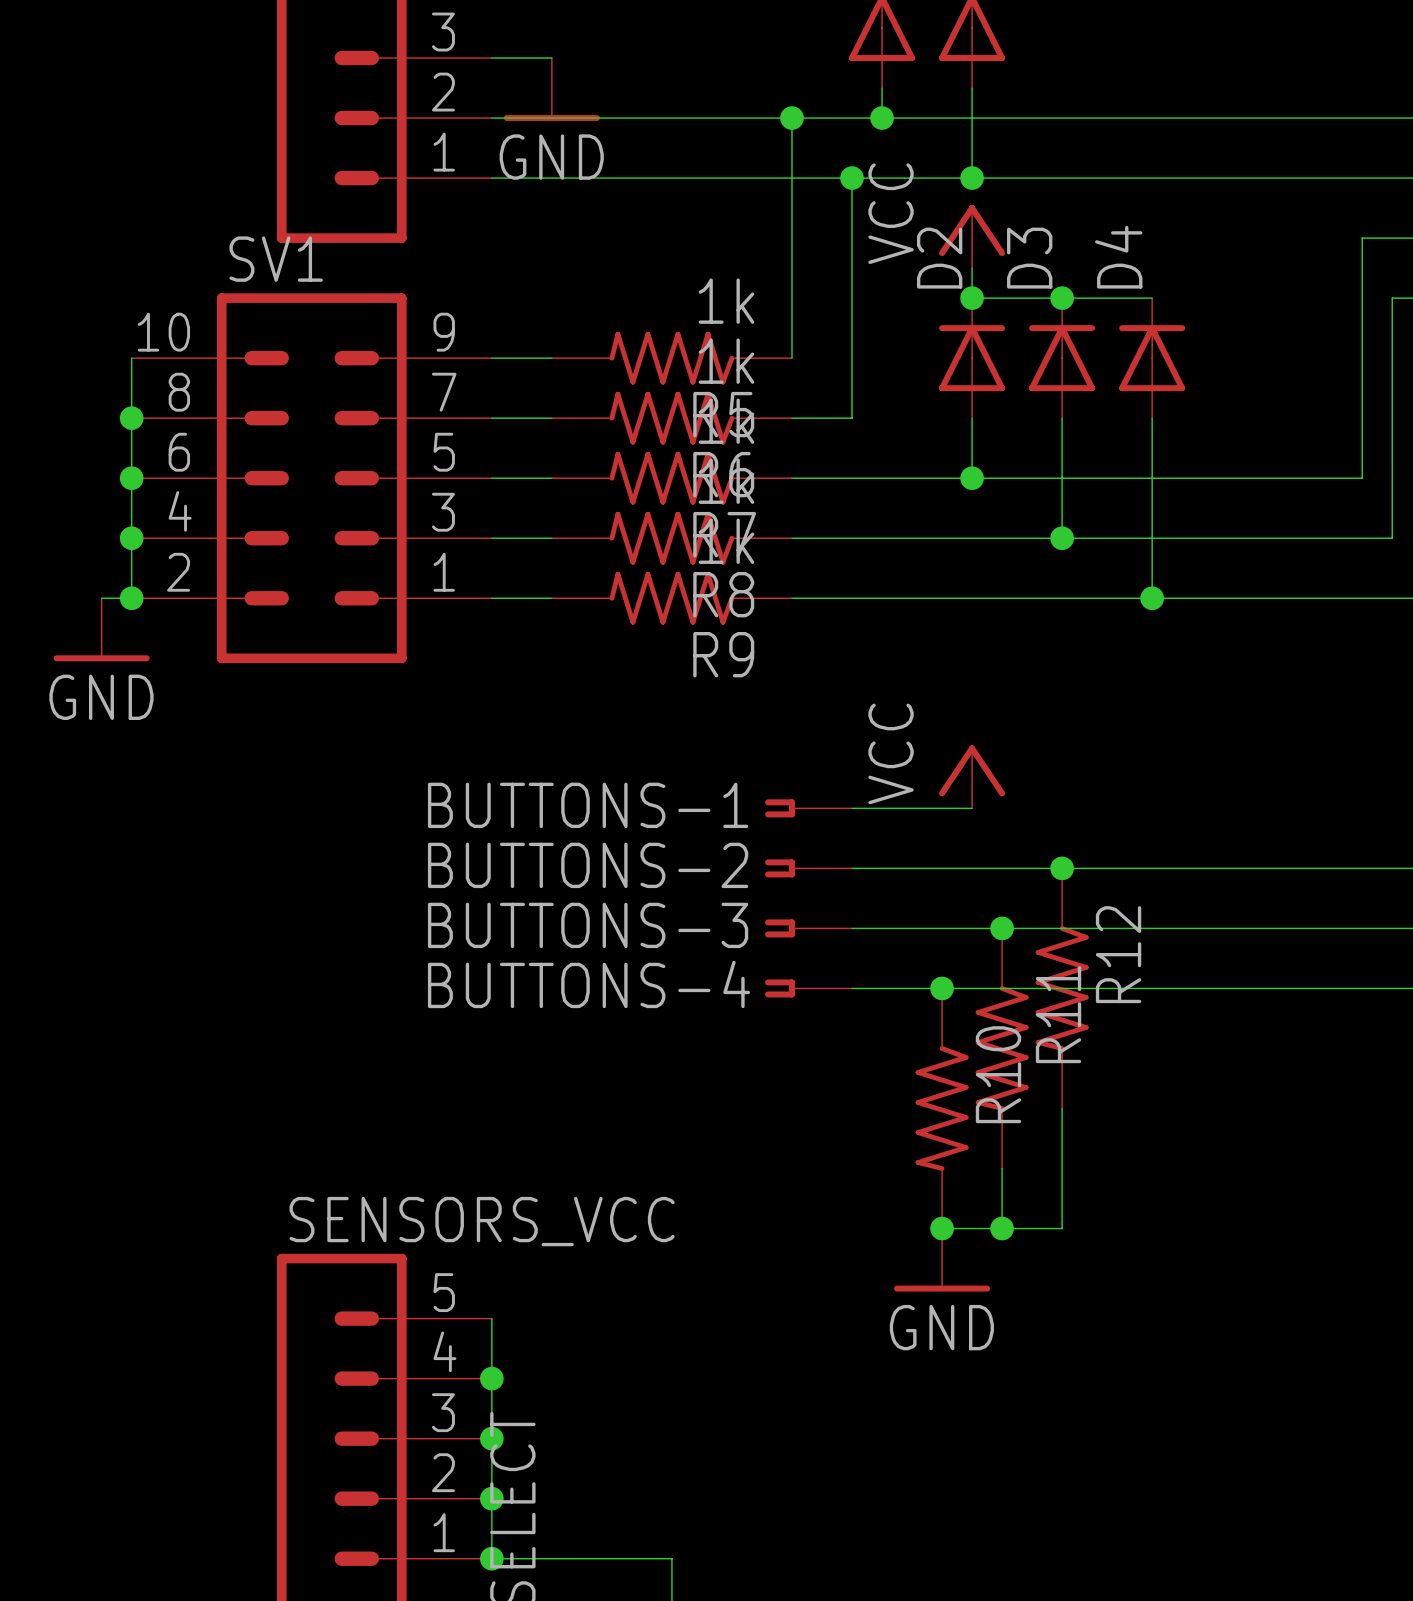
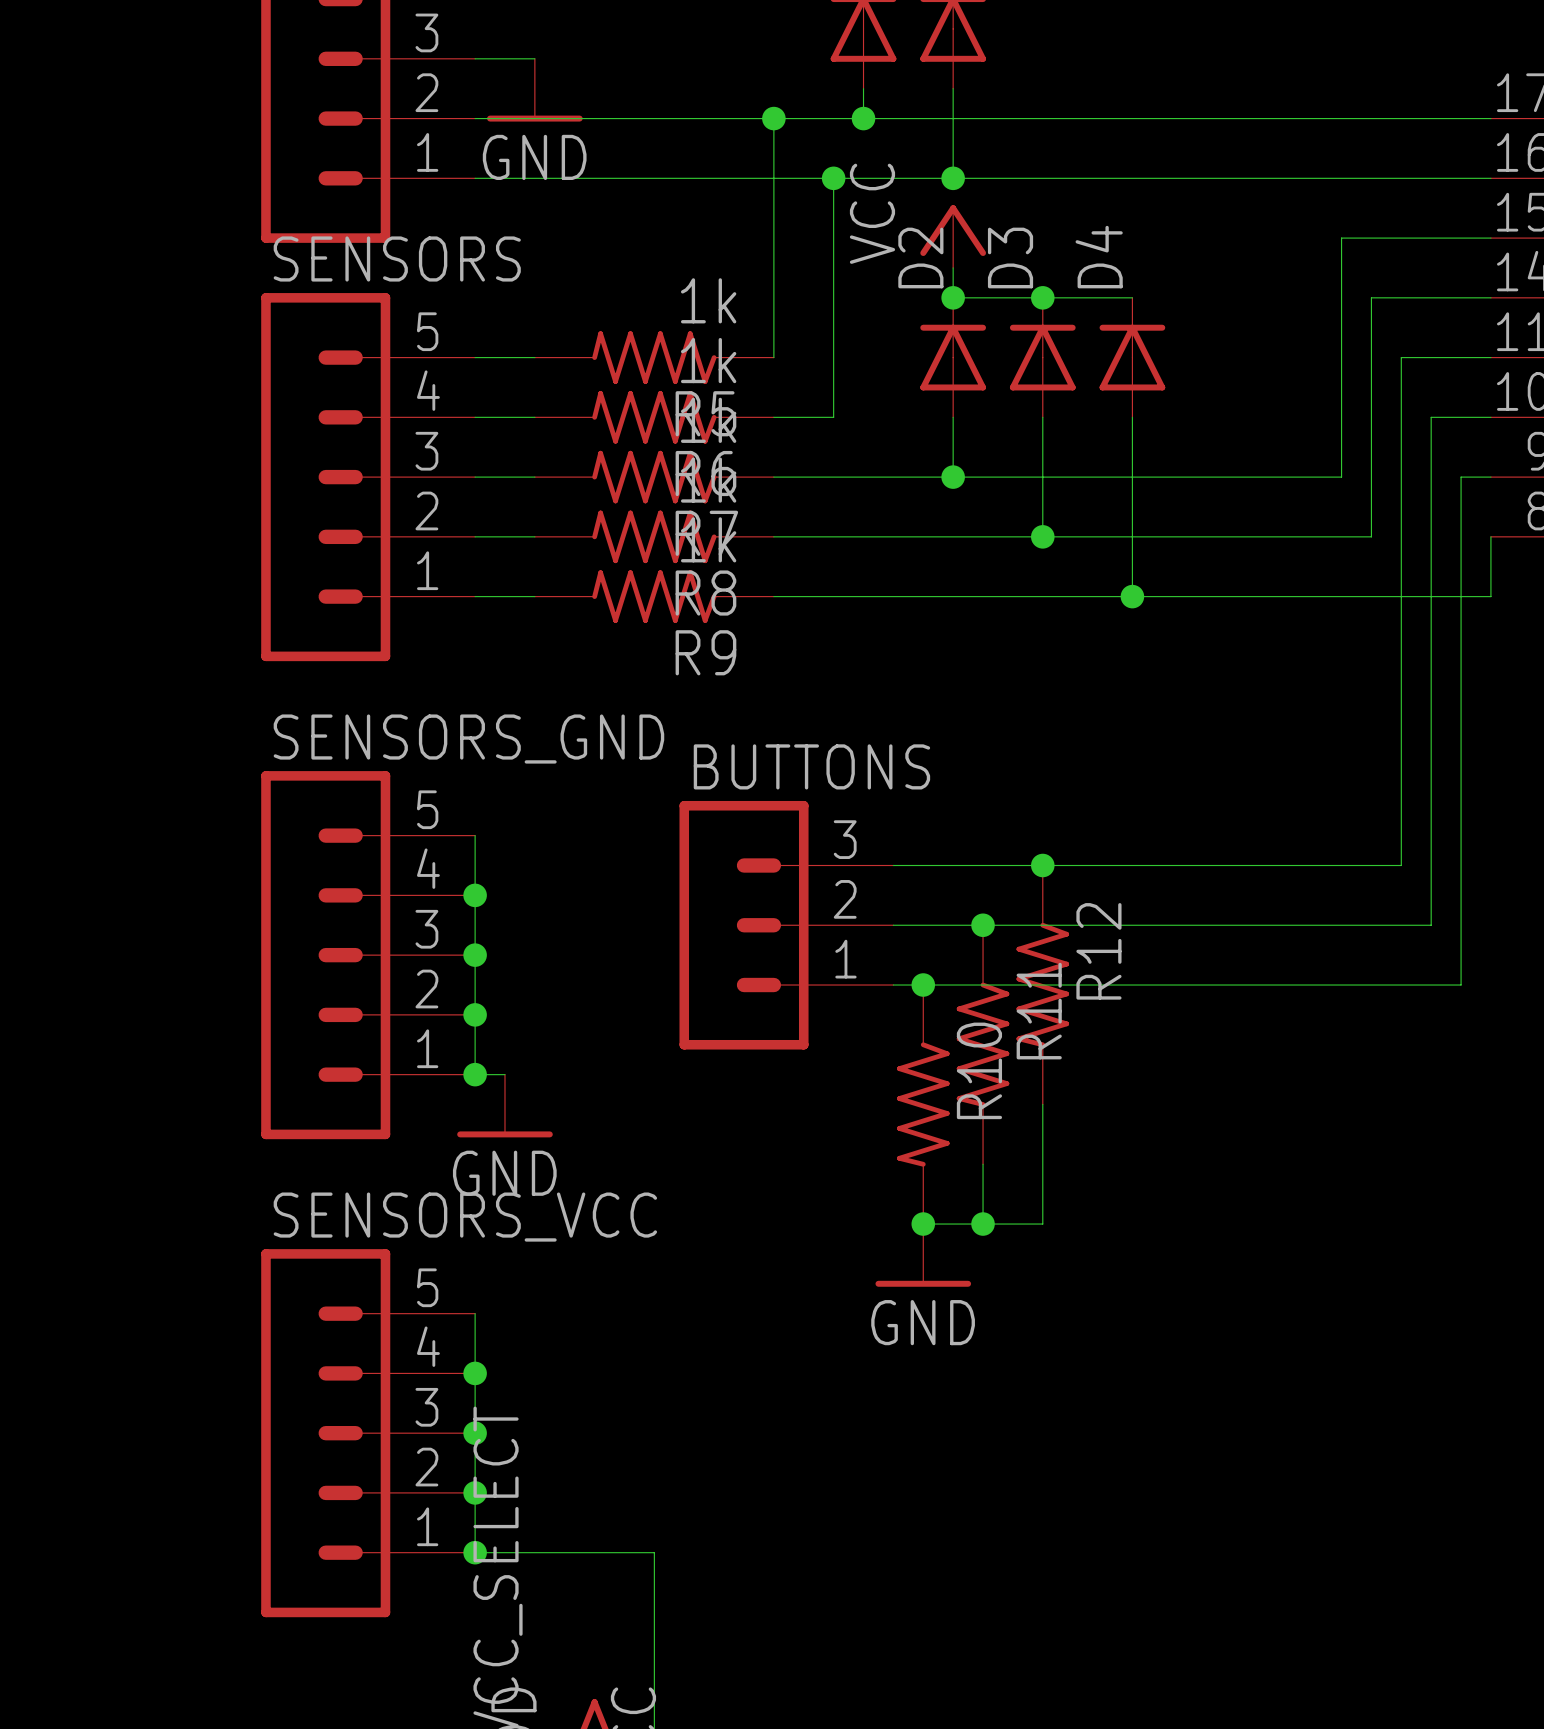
wire: (131, 358) (131, 598) (101, 598) -> none
junction: (131, 418) -> none
junction: (131, 478) -> none
SV1: (311, 478) -> none
SENSORS: none -> (368, 477)
junction: (131, 538) -> none
junction: (131, 598) -> none
power symbol: GND (101, 629) -> none
power symbol: VCC (972, 776) -> none
BUTTONS-1: (808, 808) -> none
wire: (852, 808) (972, 808) -> none
wire: none -> (475, 835) (475, 1074) (504, 1074)
BUTTONS-2: (808, 868) -> none
junction: none -> (475, 895)
BUTTONS: none -> (786, 925)
BUTTONS-3: (808, 928) -> none
SENSORS_GND: none -> (368, 955)
junction: none -> (475, 955)
BUTTONS-4: (808, 988) -> none
junction: none -> (475, 1014)
junction: none -> (475, 1074)
power symbol: none -> GND (504, 1106)

